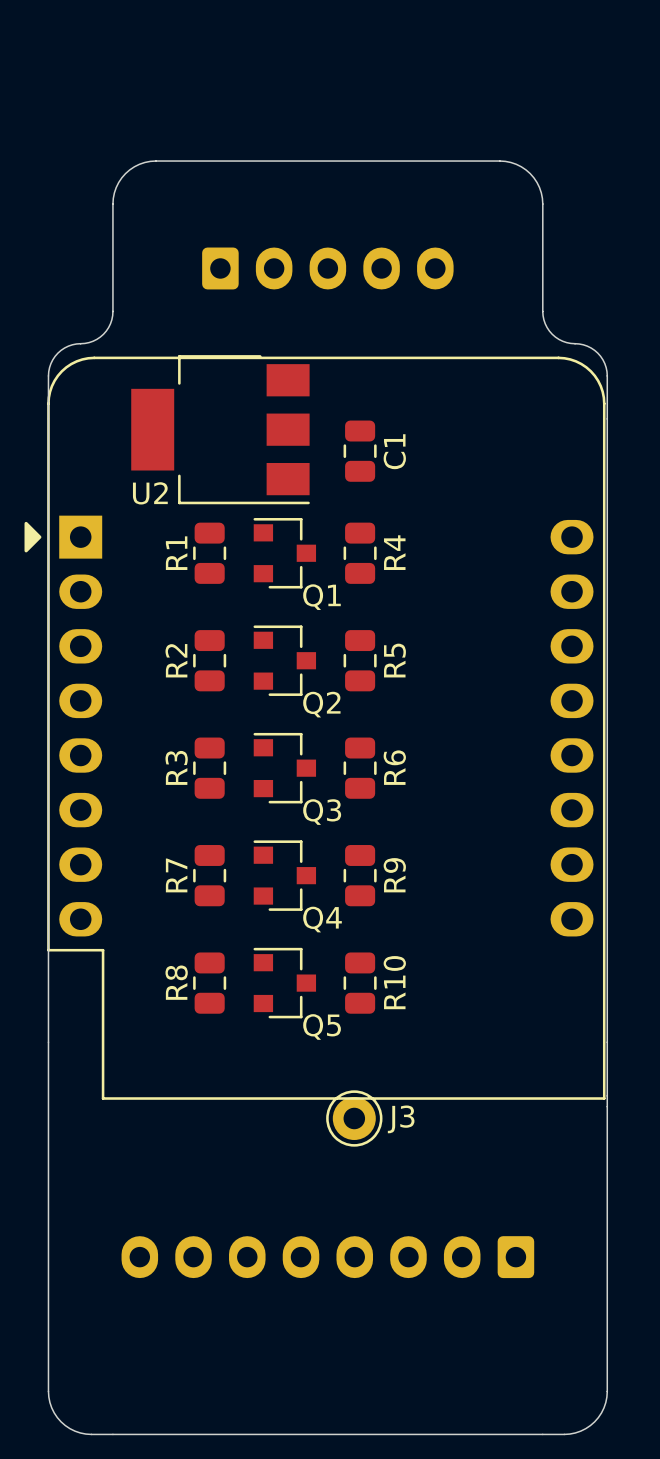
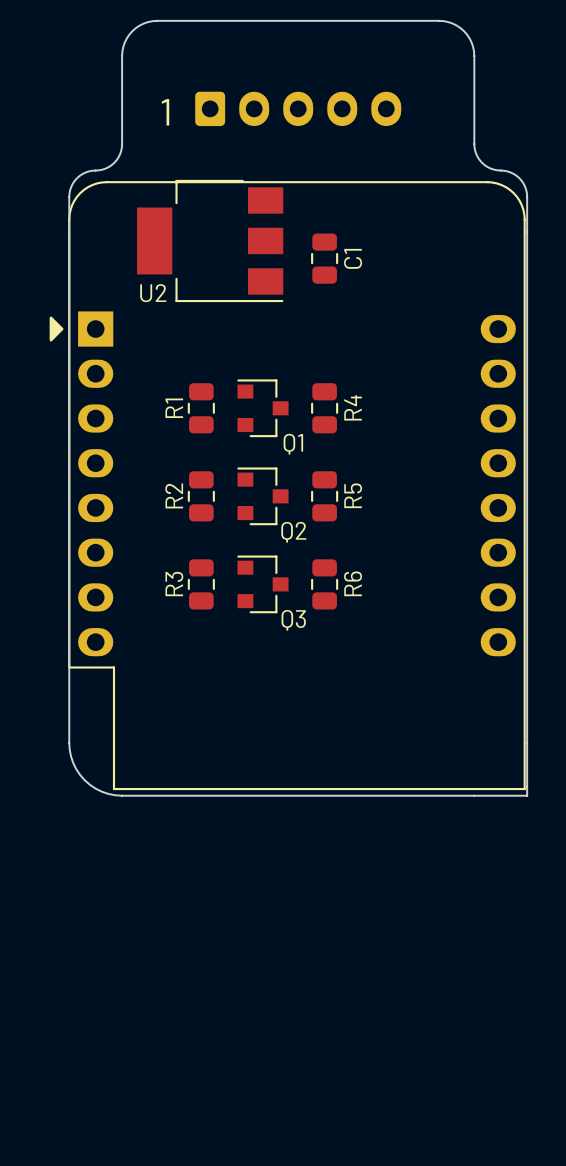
text: none -> 1 (165, 112)
board edge: (112, 204) (116, 187) (125, 173) (139, 164) (155, 161) (505, 161) (521, 166) (533, 177) (539, 187) (542, 204) -> (122, 122) (122, 56) (124, 42) (129, 34) (139, 25) (157, 20) (448, 22) (464, 31) (473, 46) (474, 122)
board edge: (112, 230) (112, 311) (110, 323) (103, 334) (96, 339) (72, 344) (61, 350) (52, 359) (48, 375) -> (122, 144) (120, 154) (111, 165) (102, 169) (82, 174) (71, 186) (69, 196) (69, 262)
board edge: (542, 230) (542, 311) (545, 323) (552, 334) (558, 339) (583, 344) (594, 350) (602, 359) (607, 375) -> (474, 144) (476, 154) (484, 165) (493, 169) (513, 174) (525, 186) (527, 196) (527, 262)
part position: (327, 268) -> (298, 108)
U2 position: (220, 429) -> (210, 240)
C1 position: (360, 451) -> (324, 258)
part position: (315, 728) -> (287, 485)
R7: (209, 875) -> none
Q4: (284, 875) -> none
R9: (360, 875) -> none
board edge: (48, 961) (48, 1397) (54, 1412) (61, 1421) (69, 1428) (85, 1434) (564, 1434) (580, 1431) (590, 1425) (603, 1407) (607, 1391) (607, 1026) -> (69, 742) (73, 763) (84, 780) (101, 791) (115, 795) (527, 795)
R8: (209, 983) -> none
Q5: (284, 983) -> none
R10: (360, 983) -> none
J3: (354, 1118) -> none
part: (327, 1257) -> none

